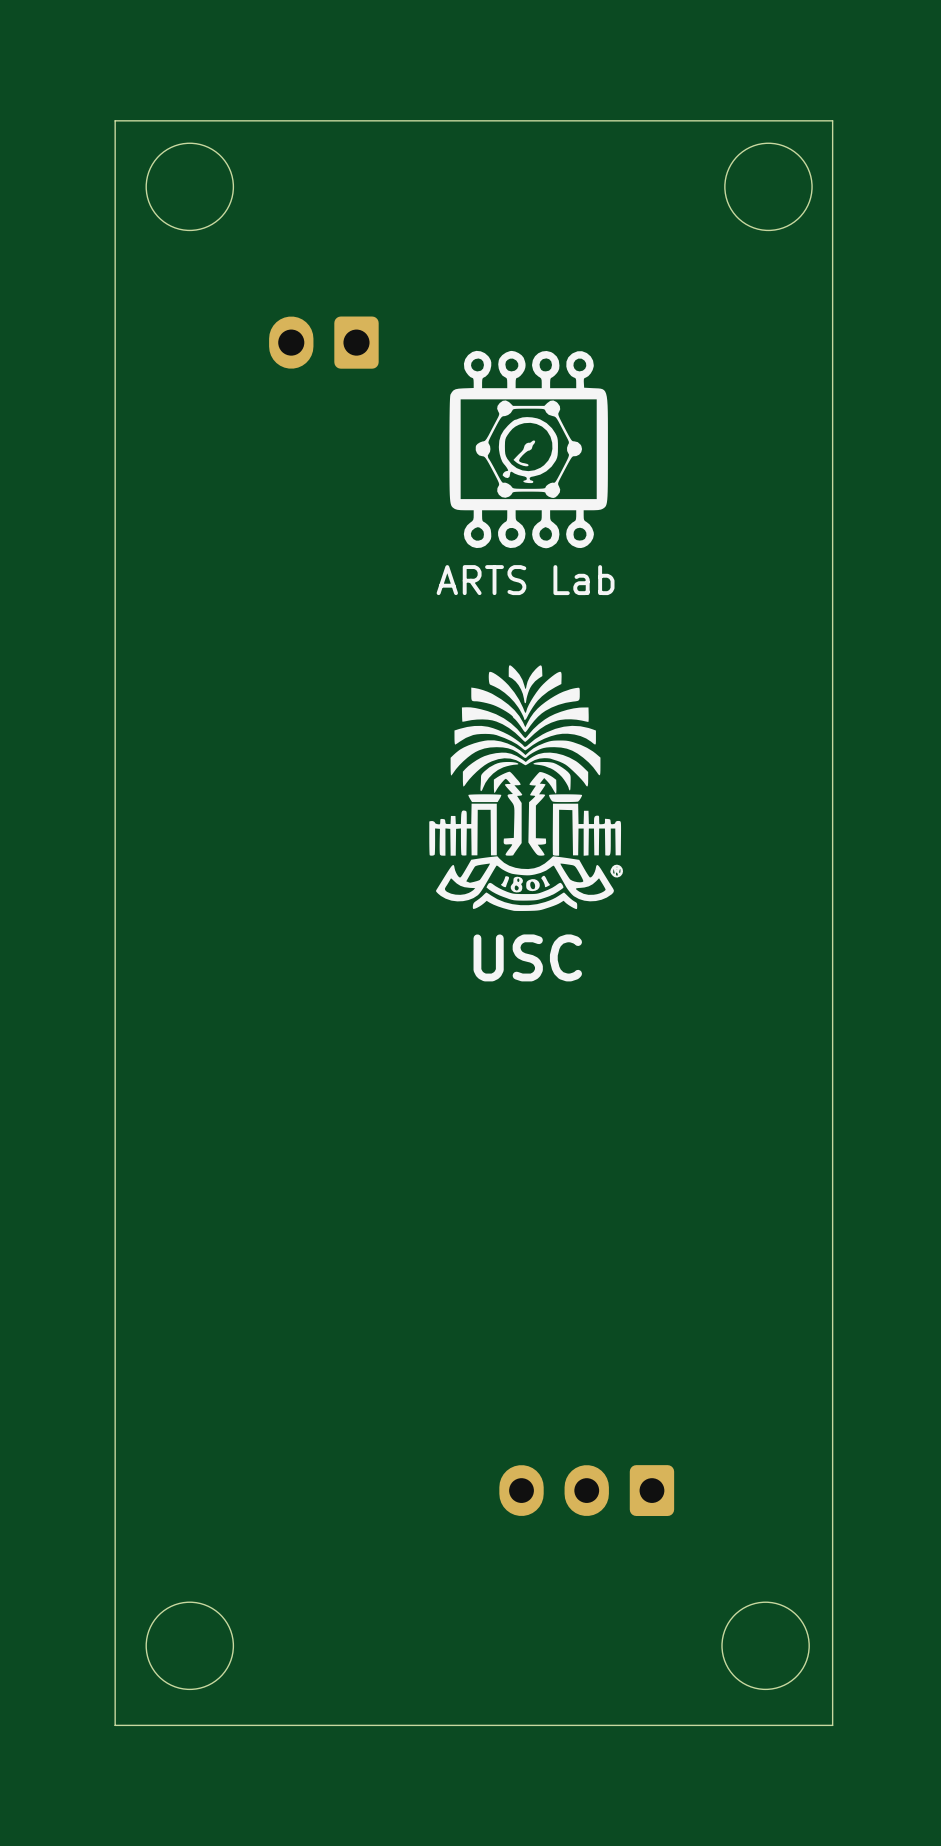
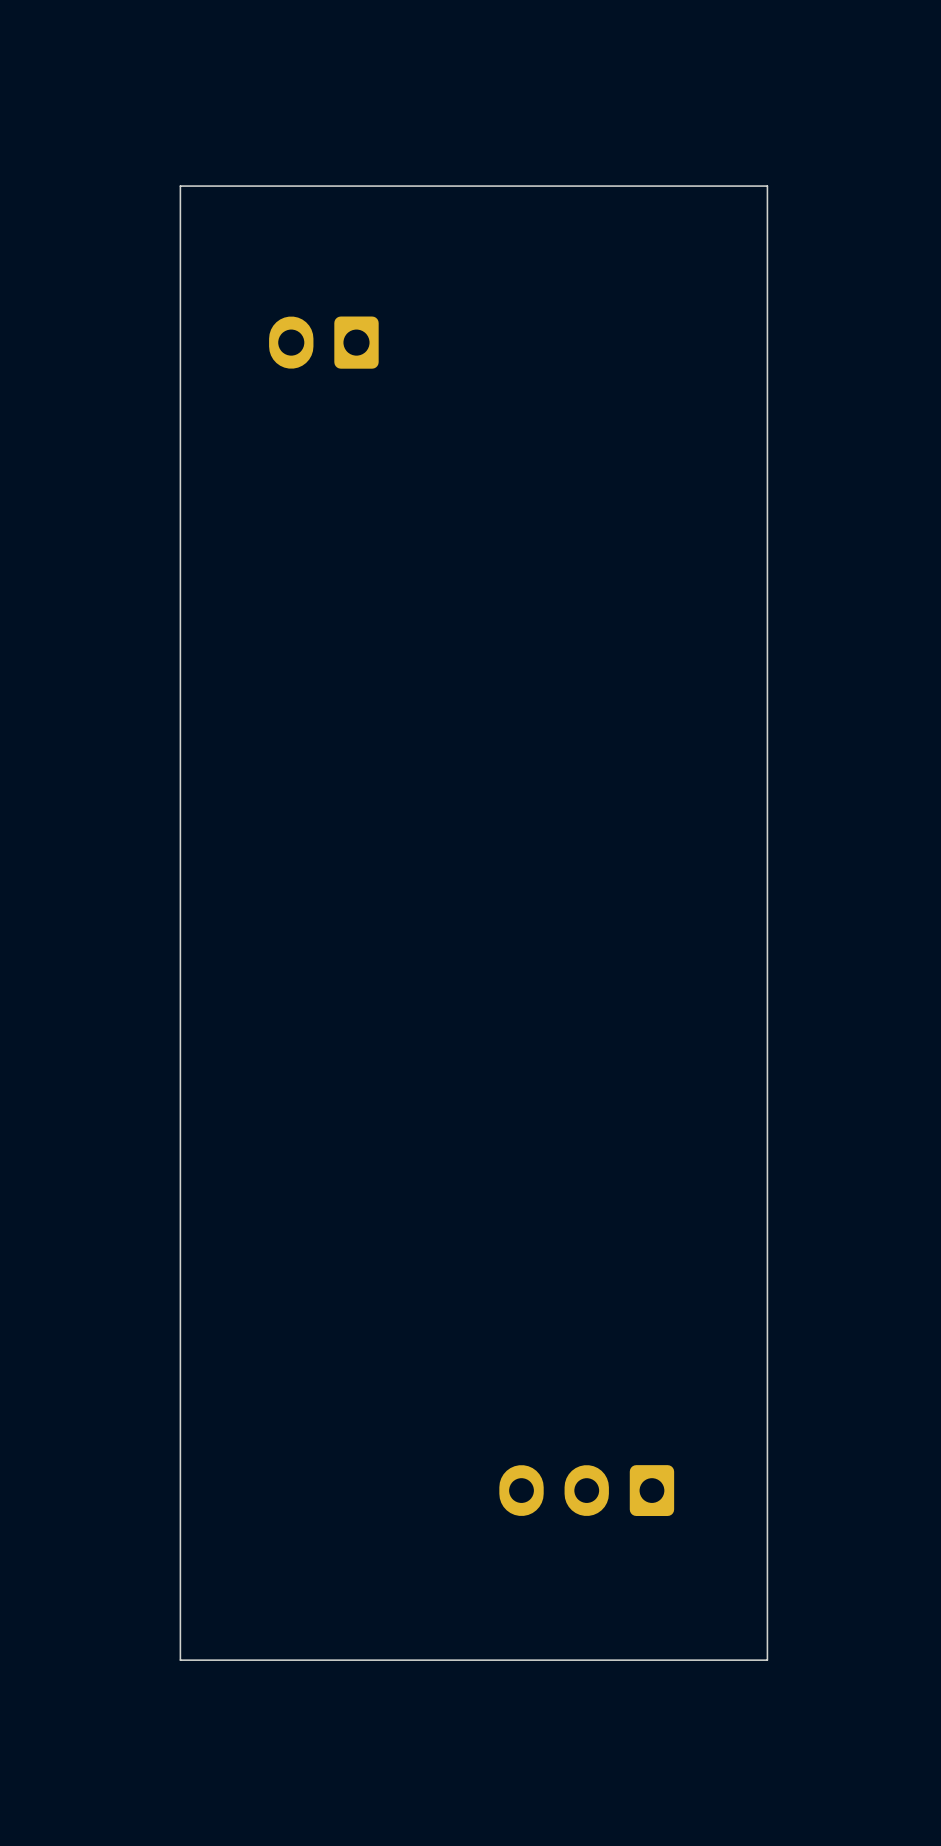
board edge: (832, 120) (115, 120) (115, 1725) (832, 1725) (832, 120) -> (767, 186) (767, 1660) (180, 1660) (180, 186) (767, 186)
round board edge: [145, 142, 235, 232] -> none
round board edge: [724, 142, 813, 232] -> none
ARTS Lab: (528, 449) -> none
USC: (526, 788) -> none
round board edge: [145, 1601, 235, 1691] -> none
round board edge: [721, 1601, 810, 1691] -> none

